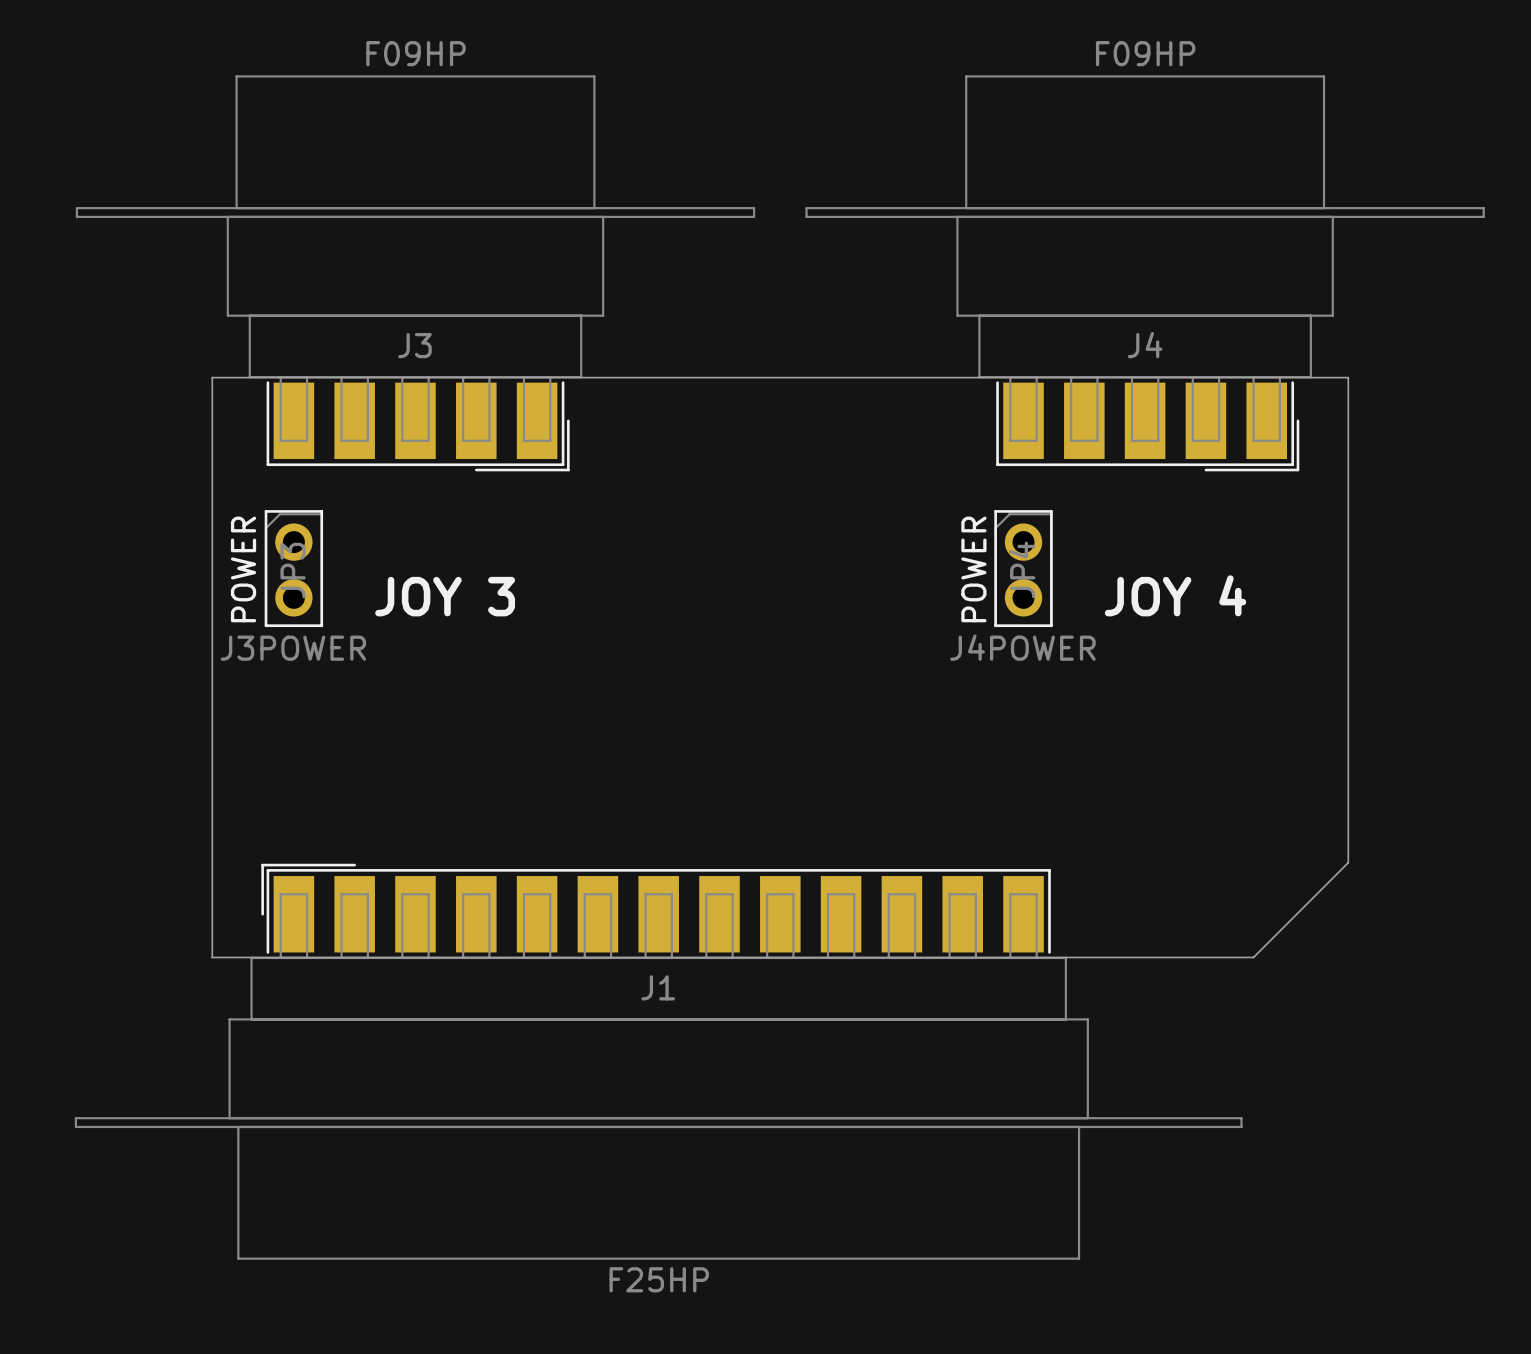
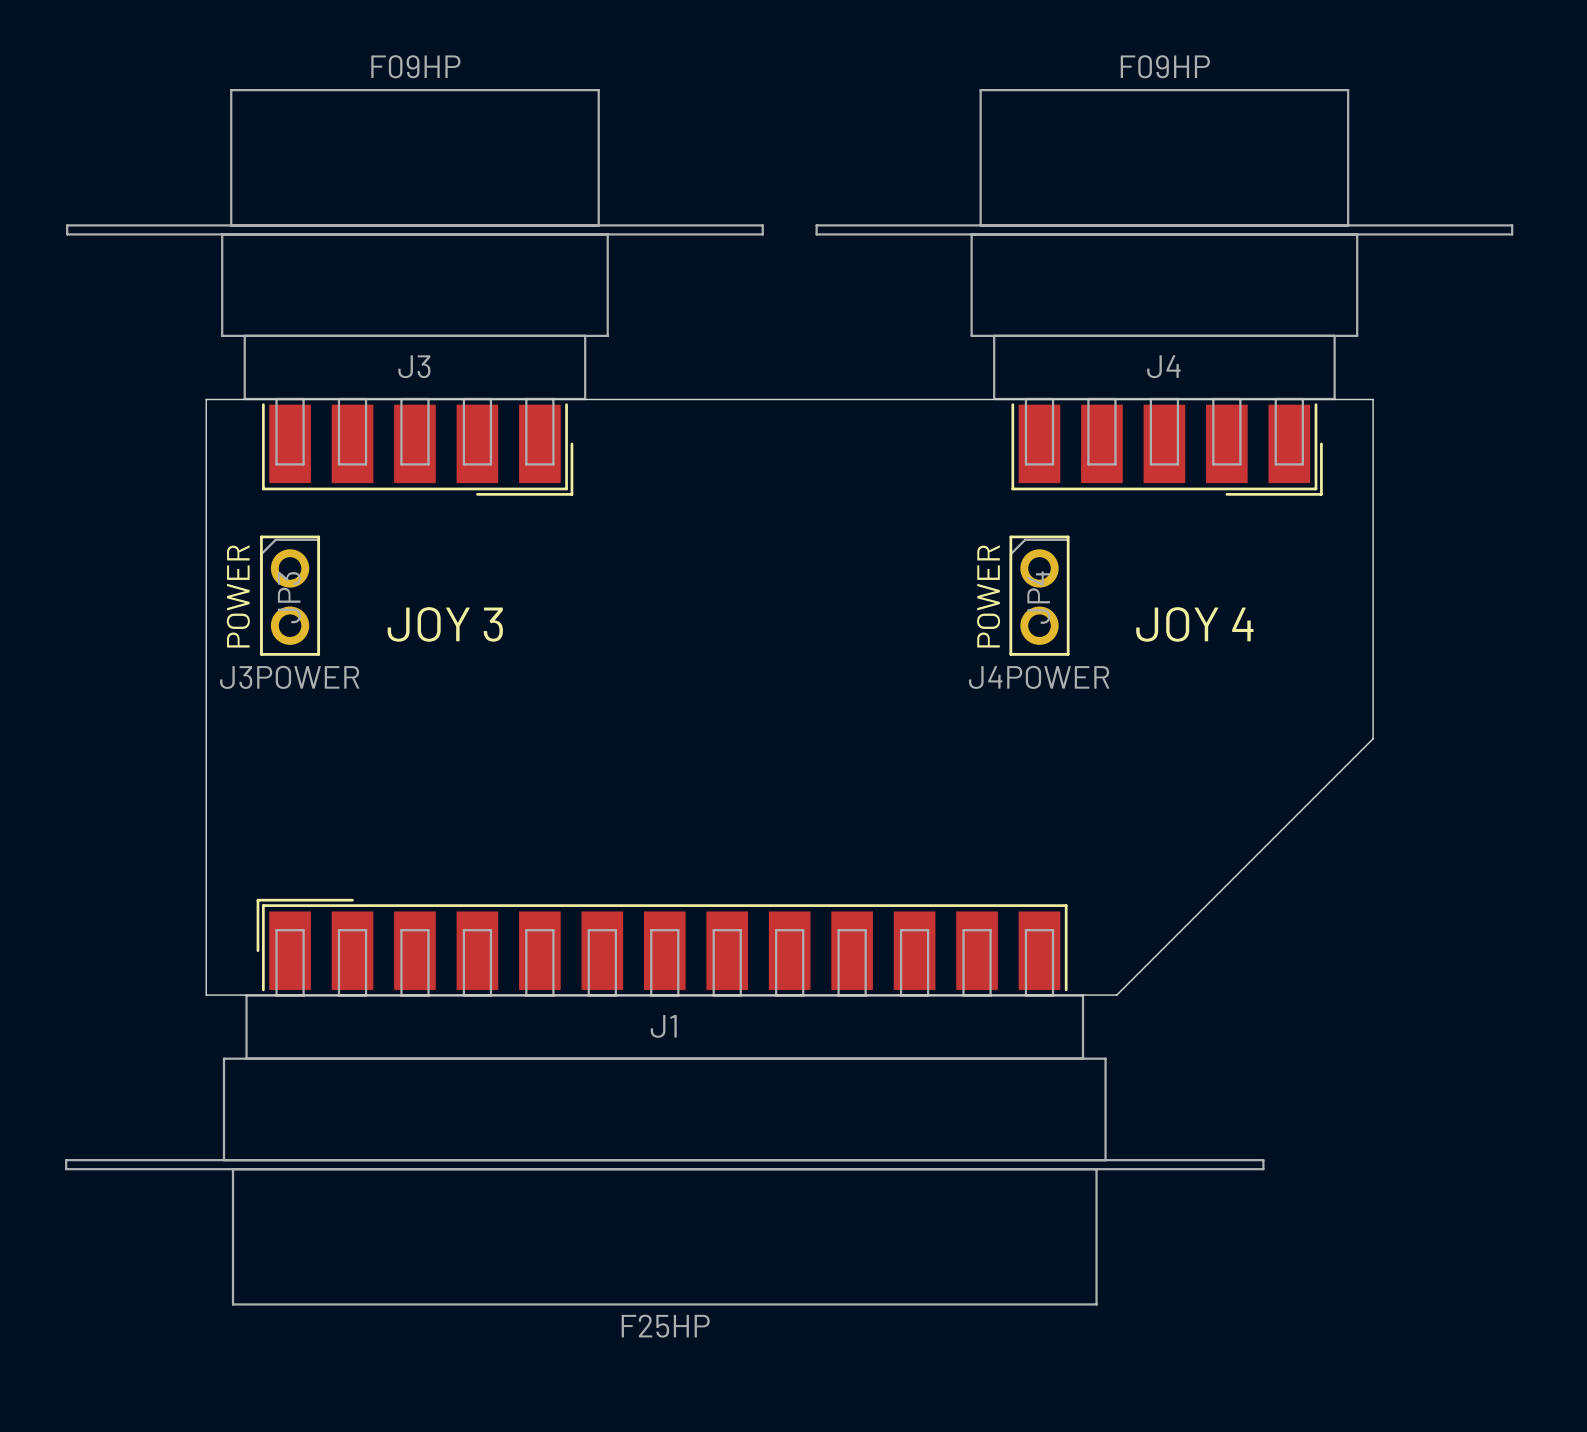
board edge: (1348, 707) (1348, 862) (1253, 957) (1098, 957) -> (1373, 738) (1116, 995)

